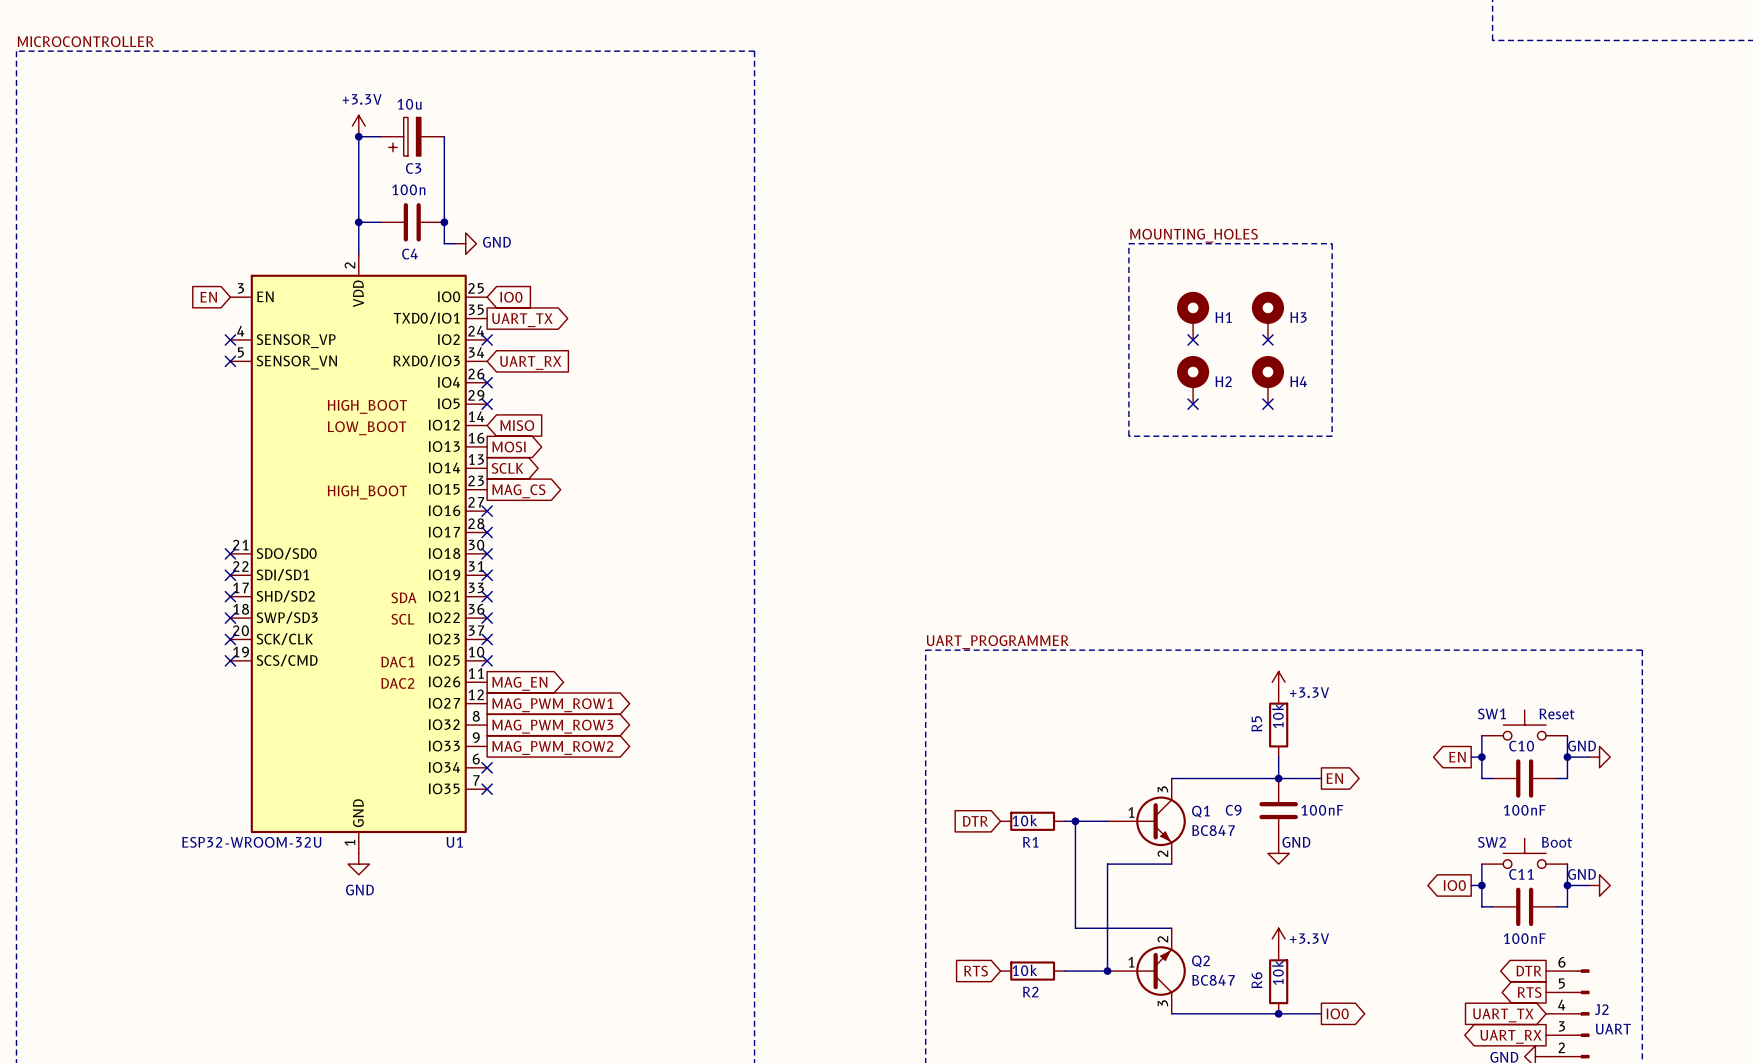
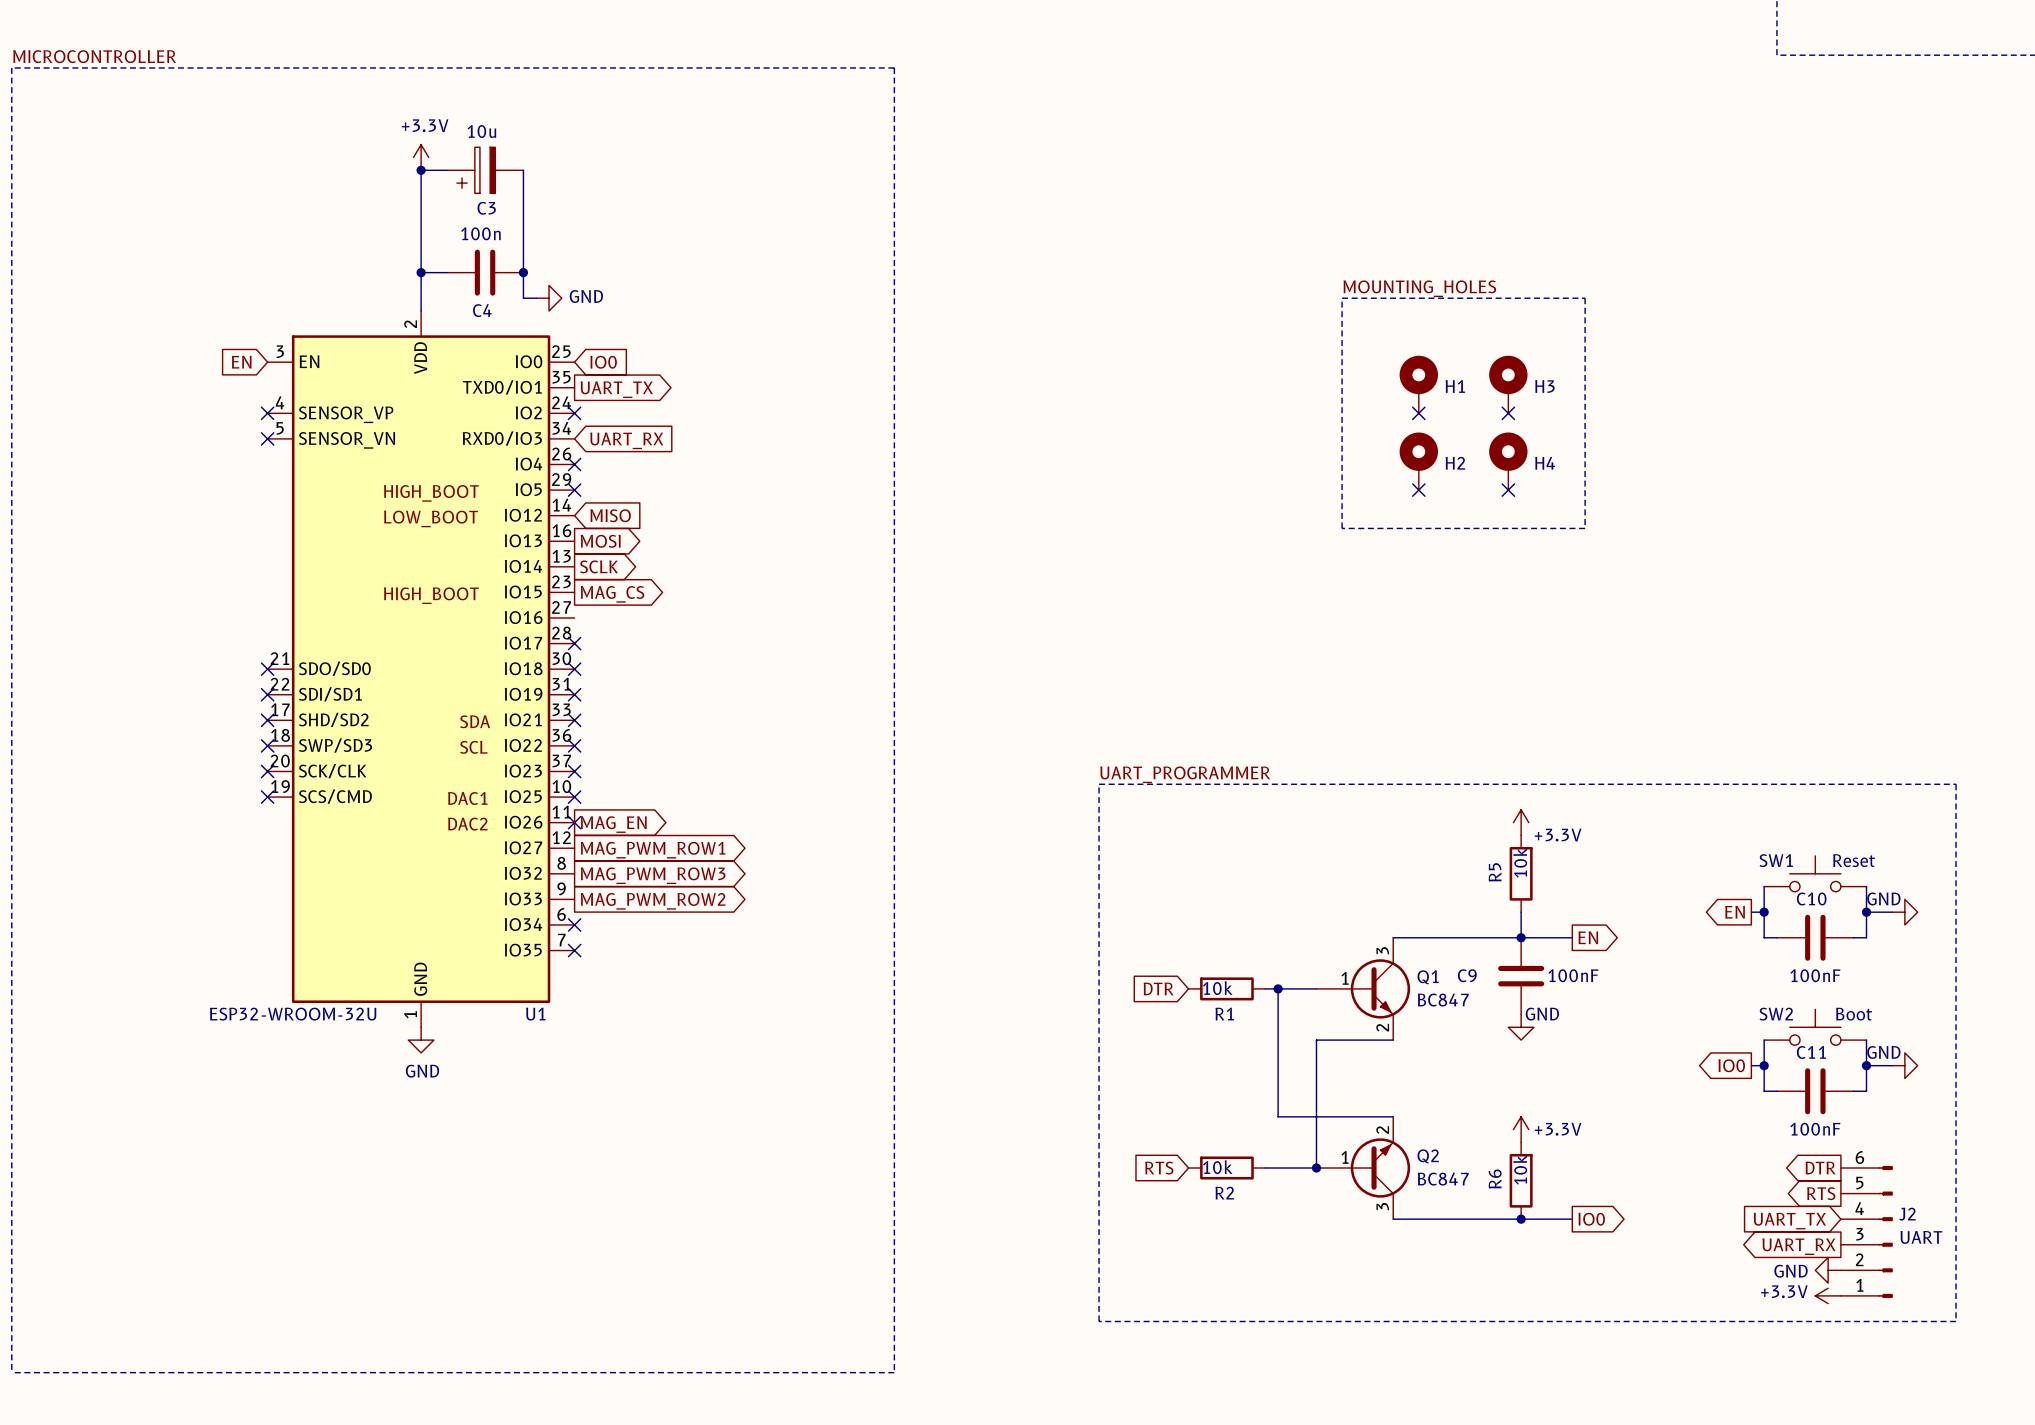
no-connect mark: (487, 511) -> none
no-connect mark: none -> (574, 822)

